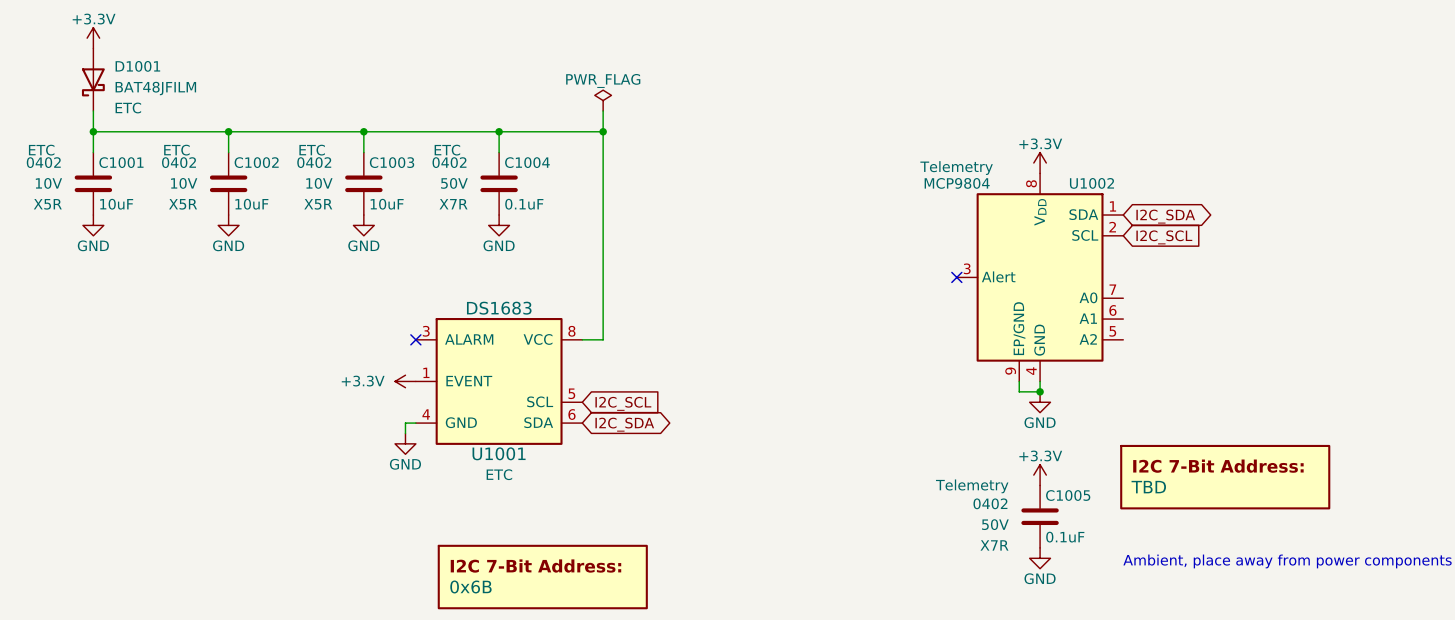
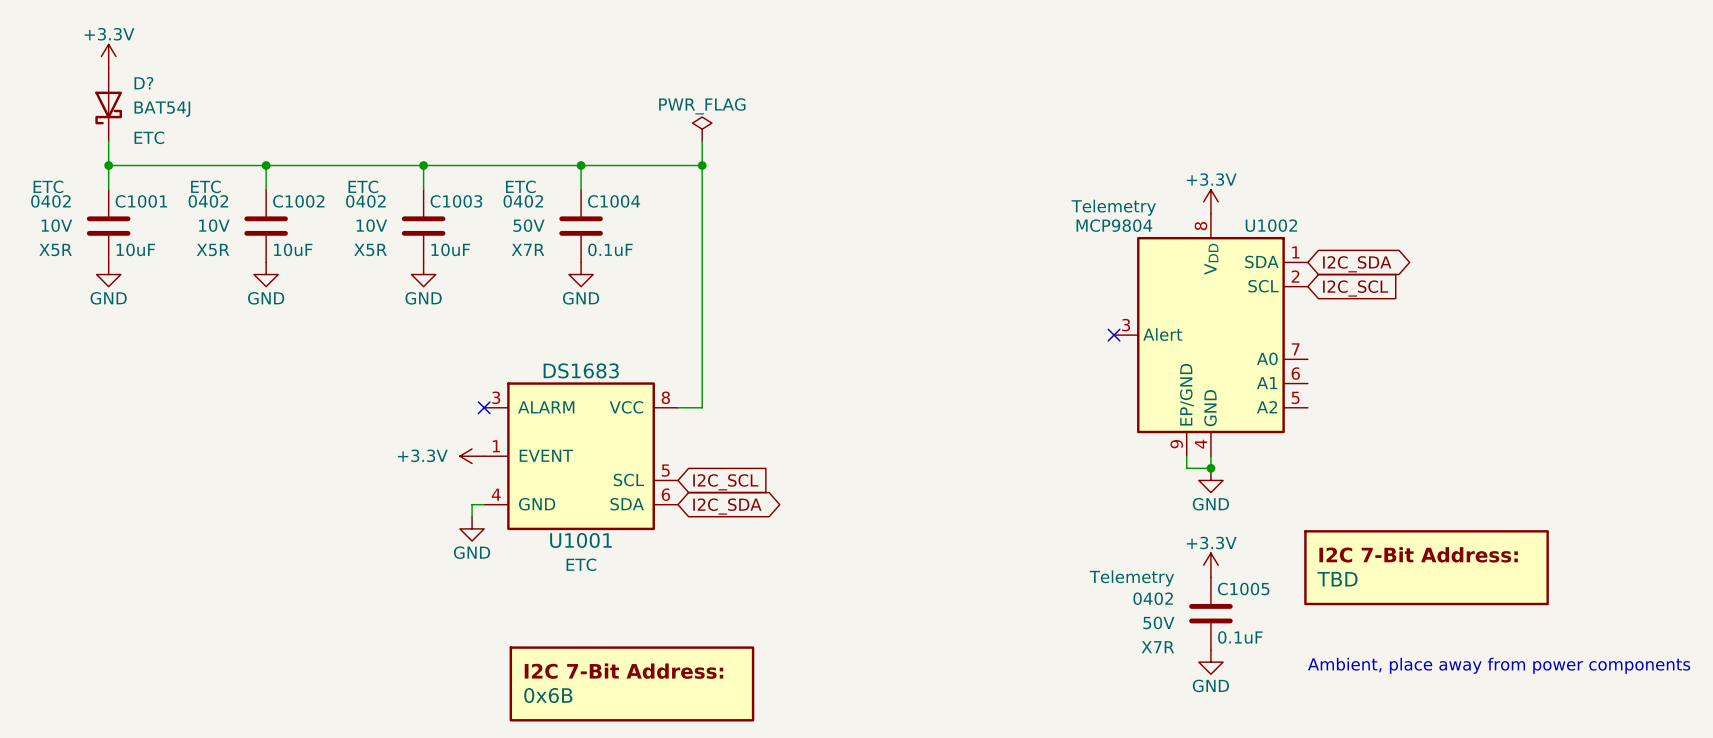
D1001 name: D1001 (137, 66) -> D? (143, 83)
D1001 value: BAT48JFILM (155, 88) -> BAT54J (162, 109)

